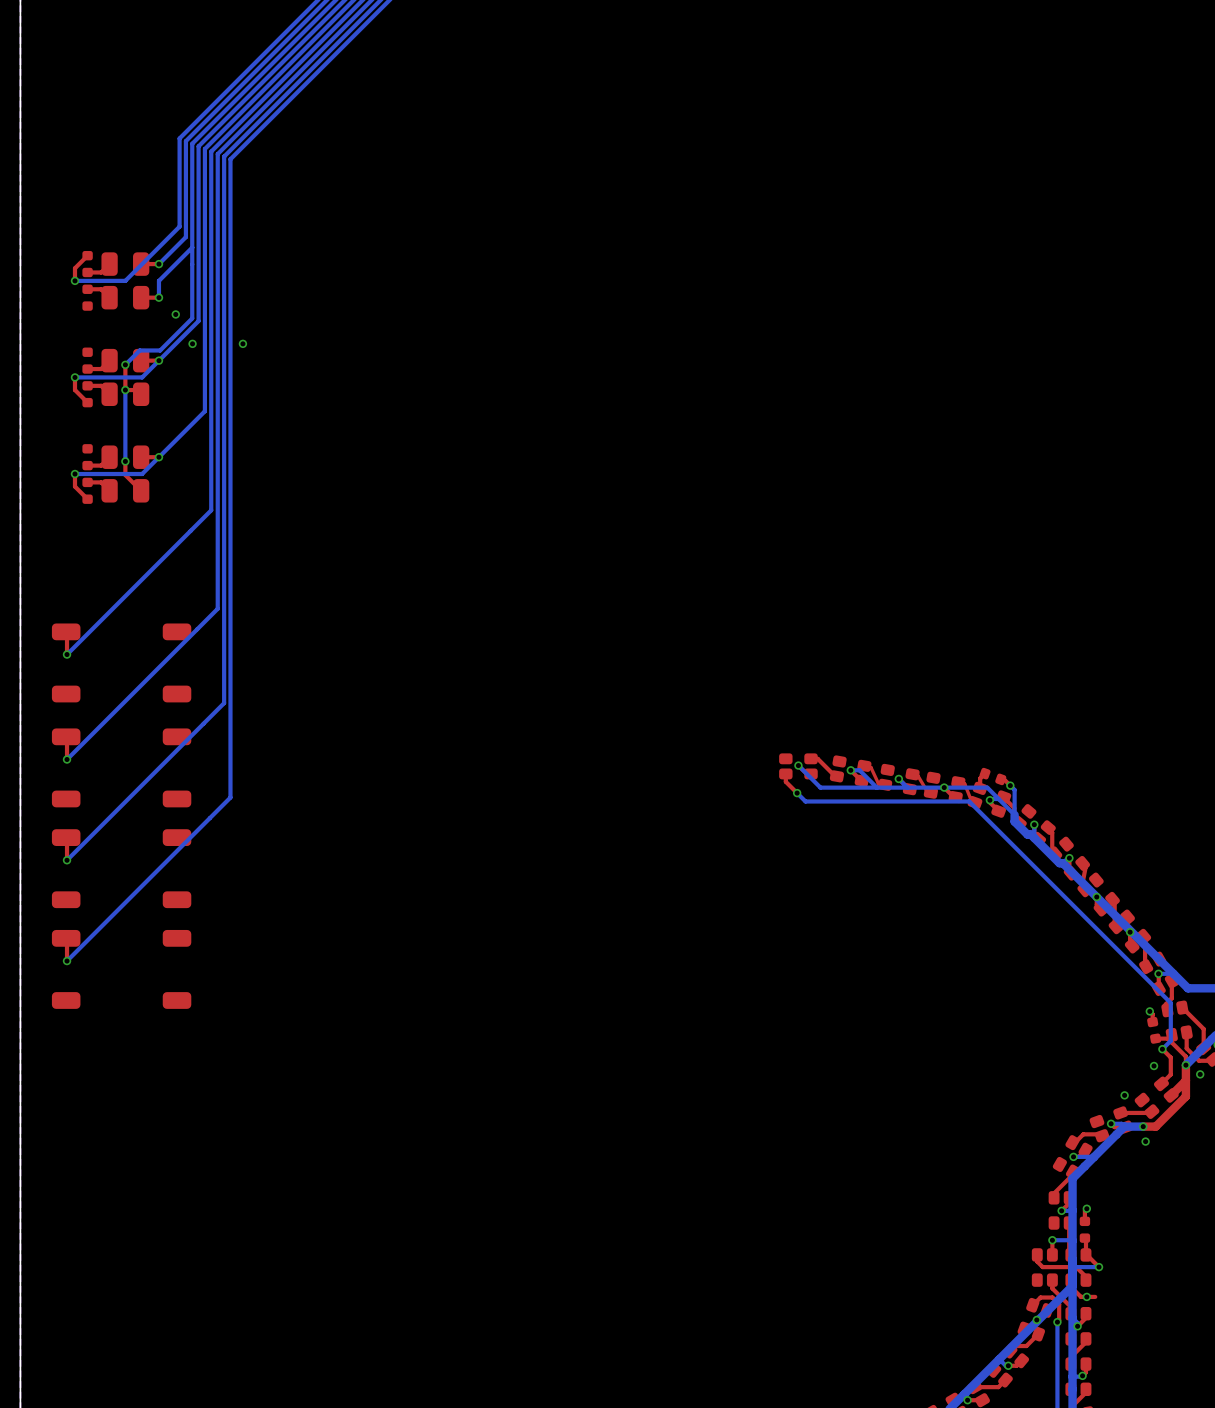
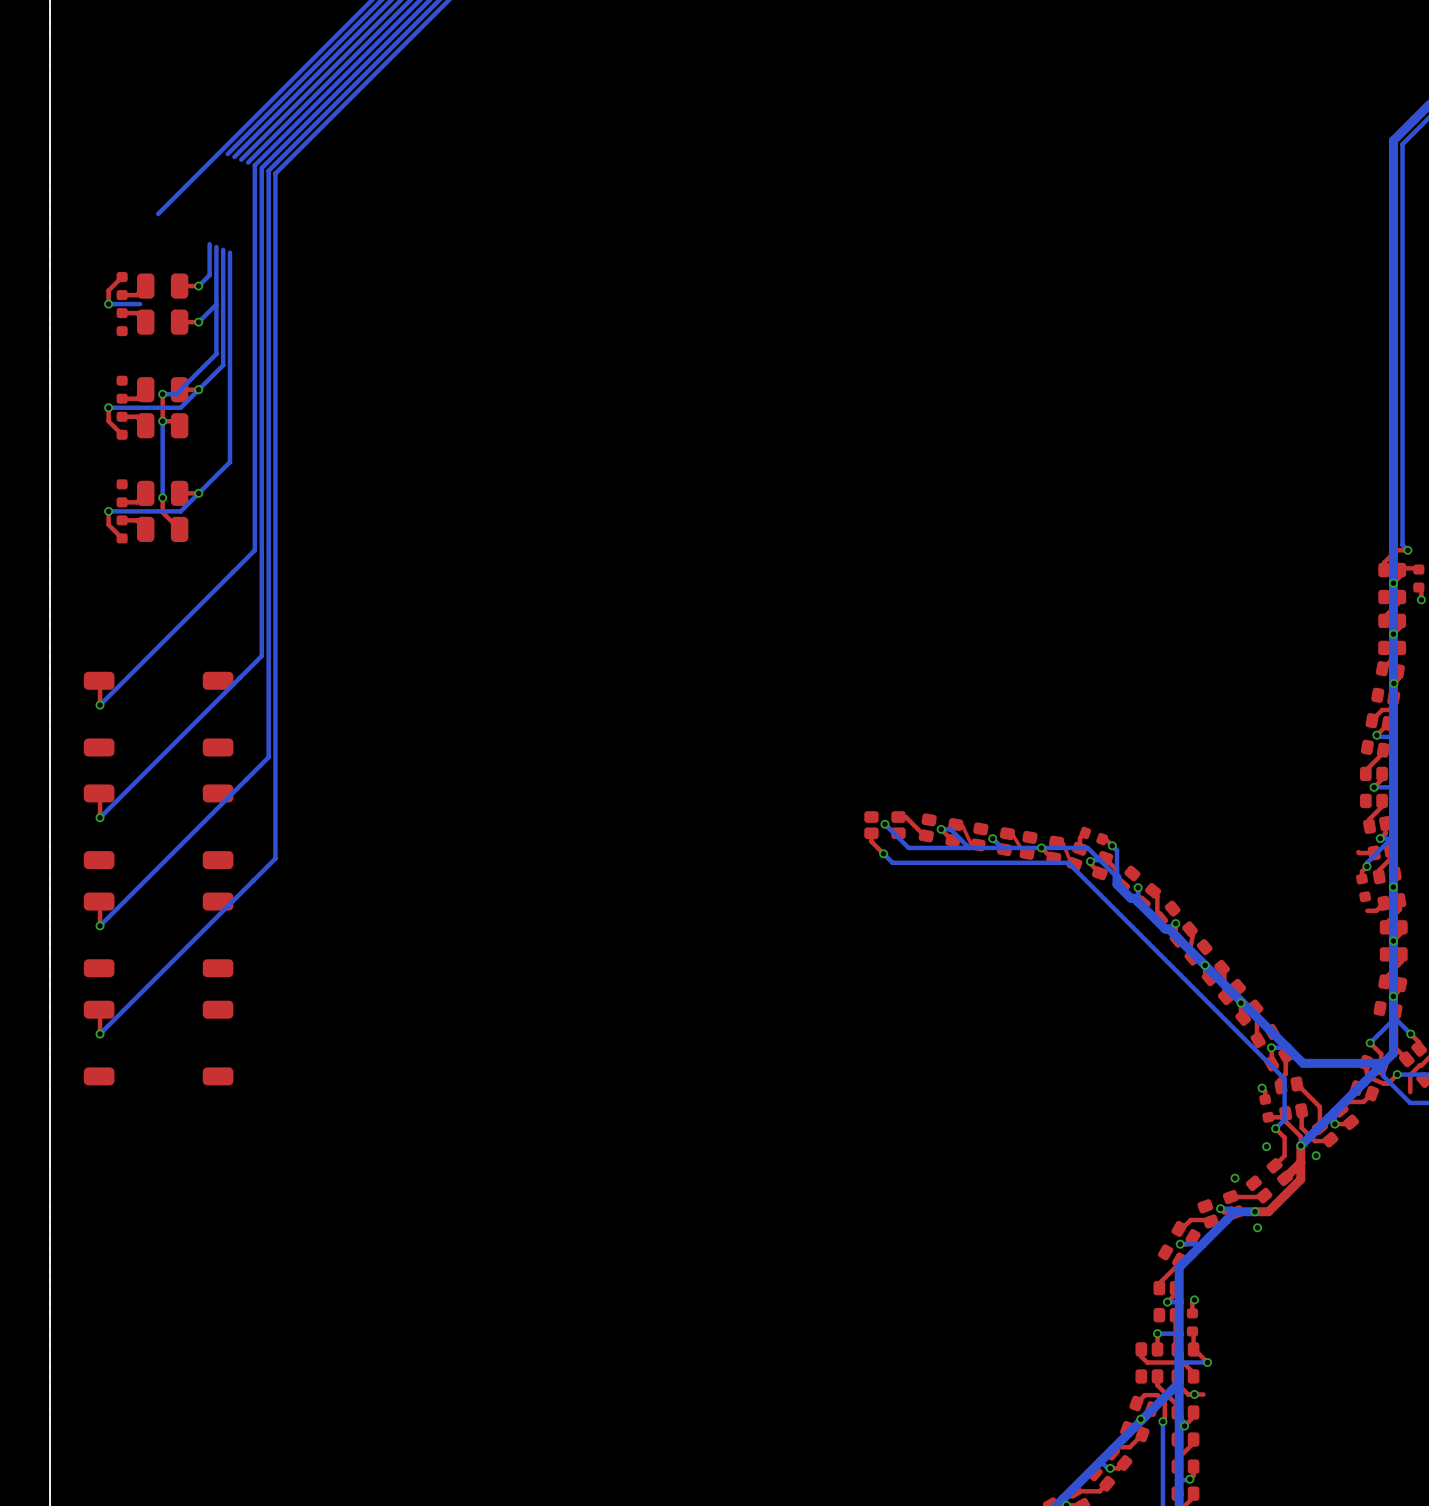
bottom track: (179, 138) (179, 226) (125, 280) (104, 280) -> (220, 151) (158, 213)
bottom track: (185, 141) (185, 237) (169, 253) -> (209, 244) (209, 275)
bottom track: (192, 143) (192, 318) (160, 350) (139, 350) (125, 364) -> (216, 247) (216, 353) (176, 394) (162, 394)
bottom track: (198, 146) (198, 321) (181, 337) -> (223, 249) (223, 365)
bottom track: (204, 148) (204, 411) (188, 428) -> (230, 252) (230, 462)
bottom track: (192, 247) (158, 280) (158, 297) -> (216, 304) (198, 322)
via: (175, 314) -> none
via: (192, 343) -> none
via: (242, 343) -> none

